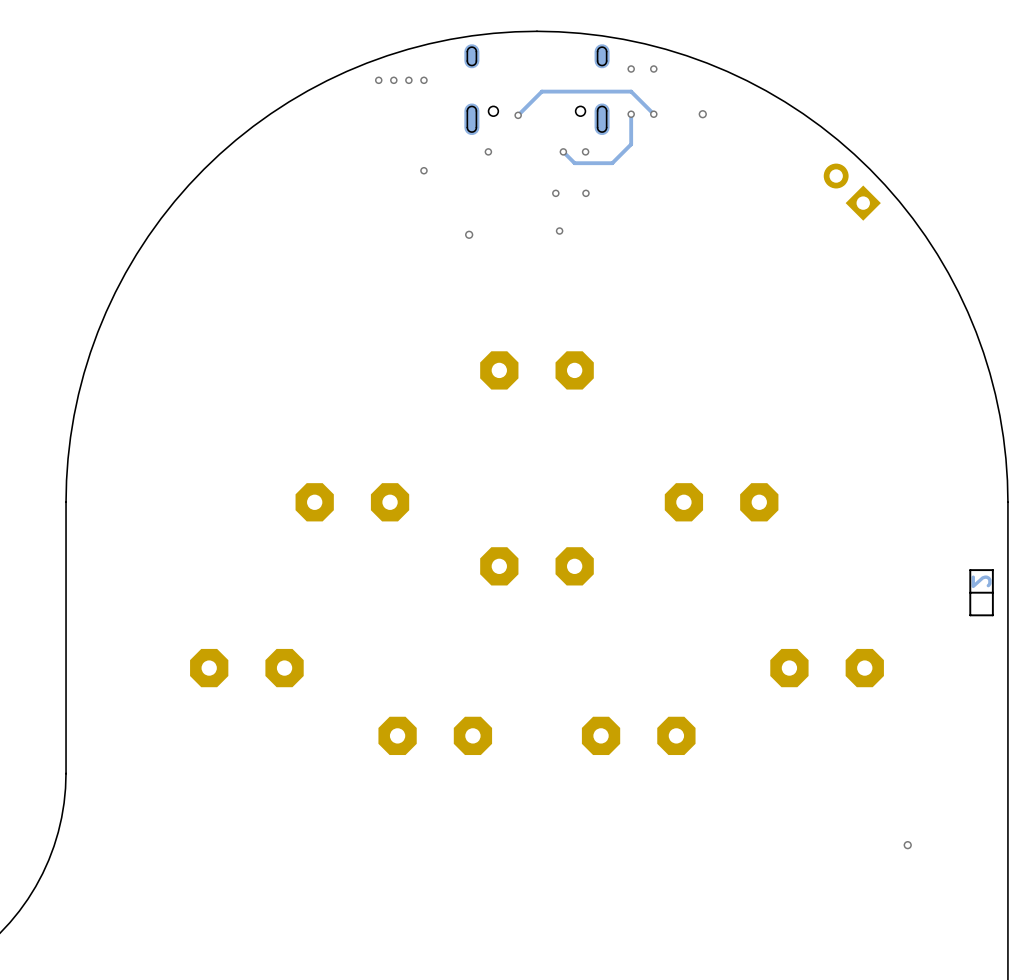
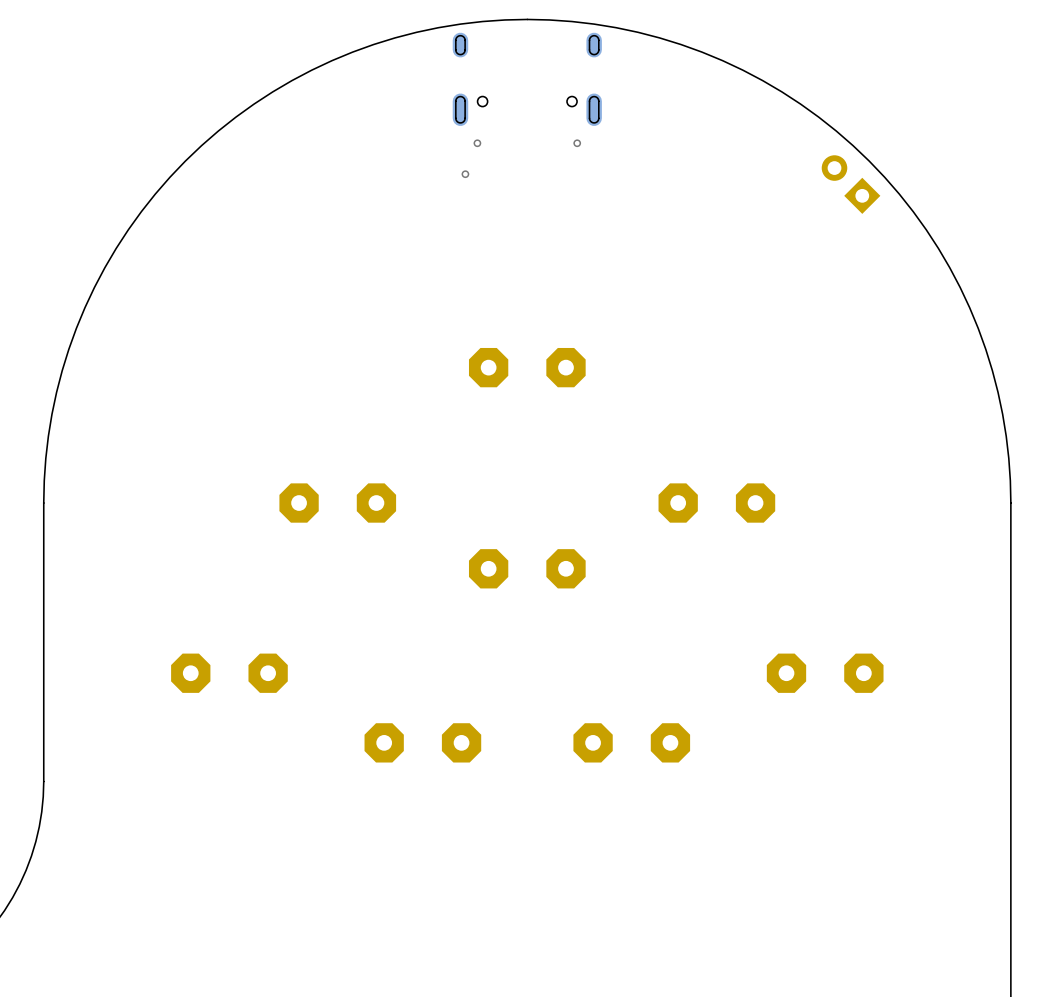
via: (631, 69) -> none
via: (653, 69) -> none
via: (378, 80) -> none
via: (393, 80) -> none
via: (408, 80) -> none
via: (423, 80) -> none
track: (631, 114) (631, 144) (612, 163) (574, 163) (563, 151) -> none
via: (631, 114) -> none
track: (653, 114) (631, 91) (541, 91) (518, 115) -> none
via: (653, 114) -> none
via: (702, 114) -> none
via: (518, 115) -> none
via: (563, 151) -> none
via: (423, 170) -> none
via: none -> (465, 174)
via: (555, 193) -> none
via: (585, 193) -> none
via: (559, 231) -> none
via: (469, 234) -> none
drawing: [969, 569, 994, 617] -> none
via: (907, 845) -> none

